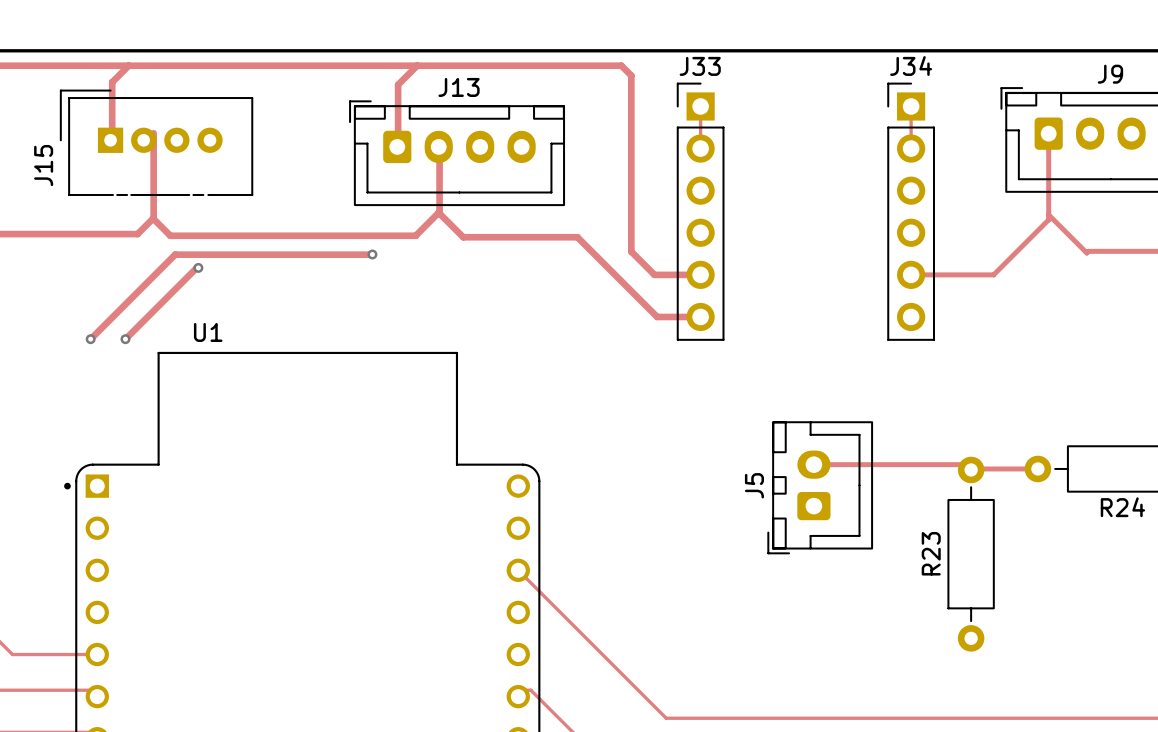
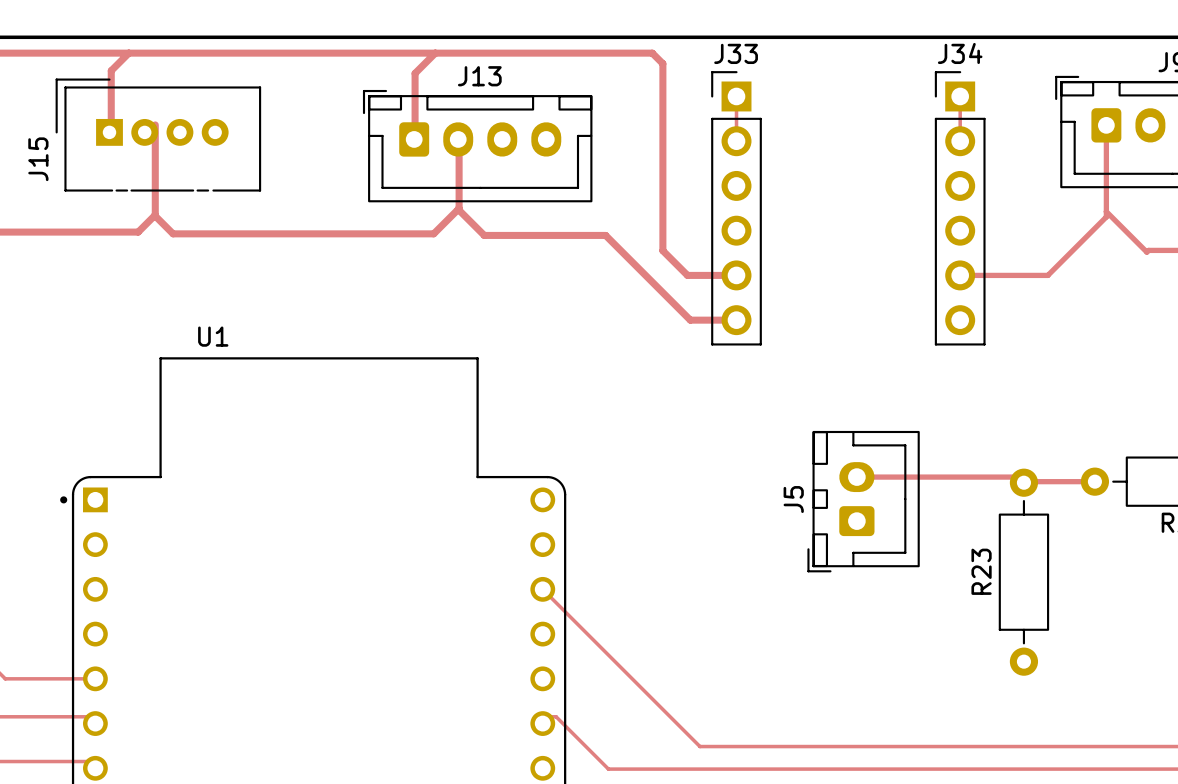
track: (372, 254) (175, 254) (90, 339) -> none
via: (372, 254) -> none
track: (198, 267) (125, 339) -> none
via: (198, 267) -> none
via: (90, 339) -> none
via: (125, 339) -> none

